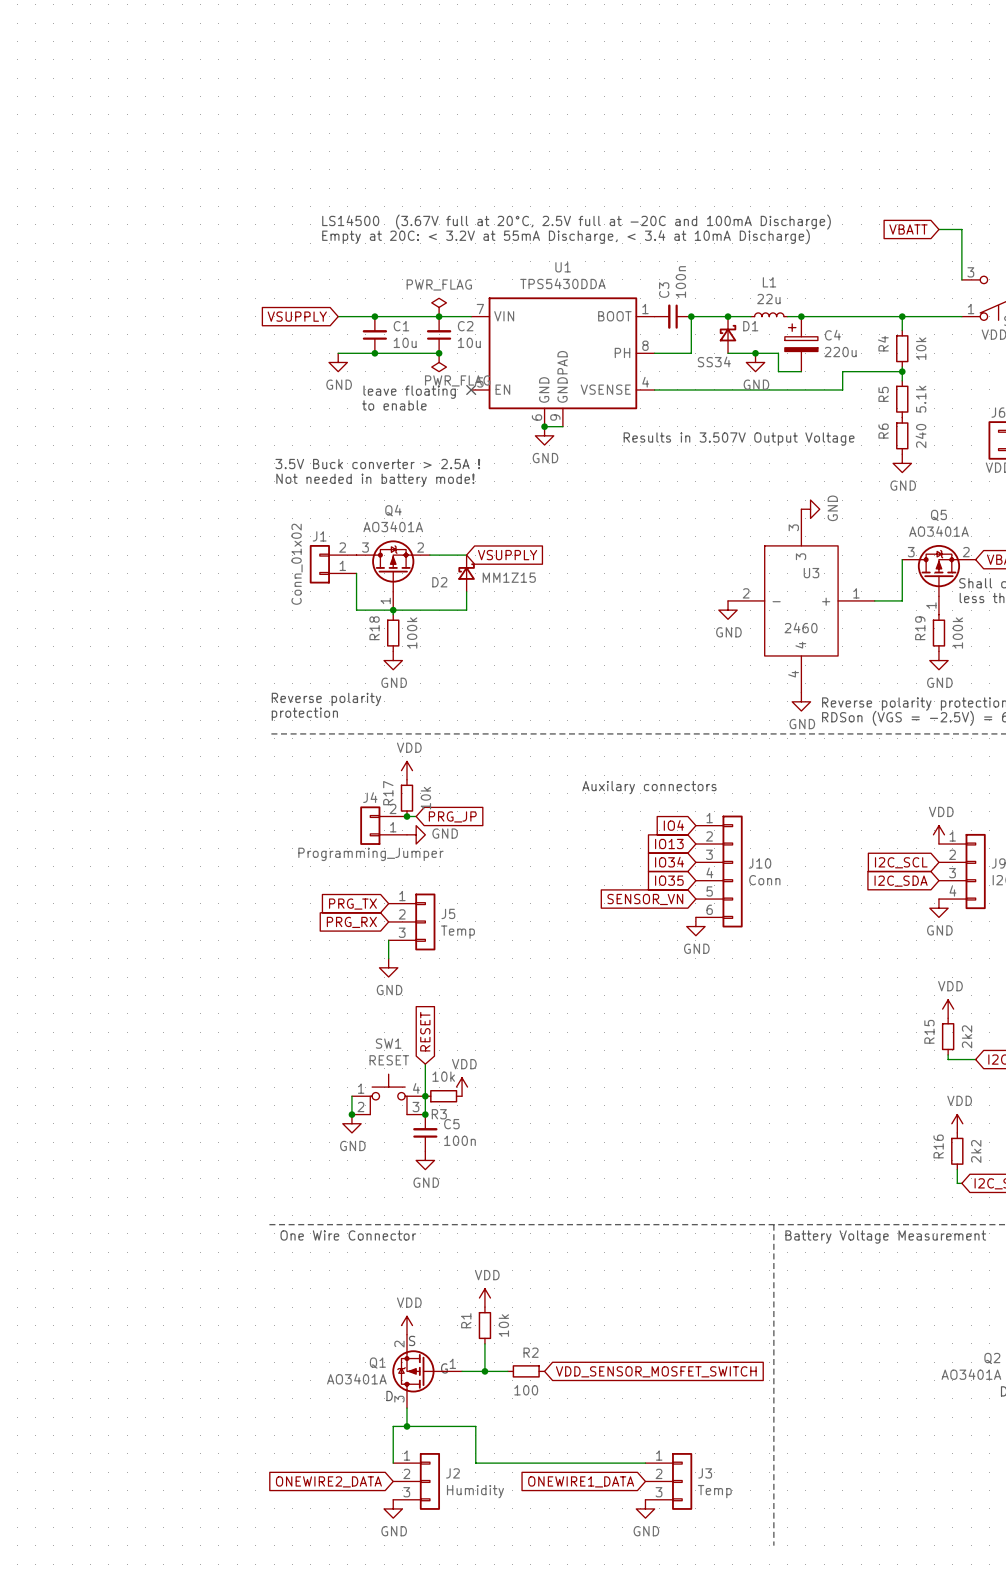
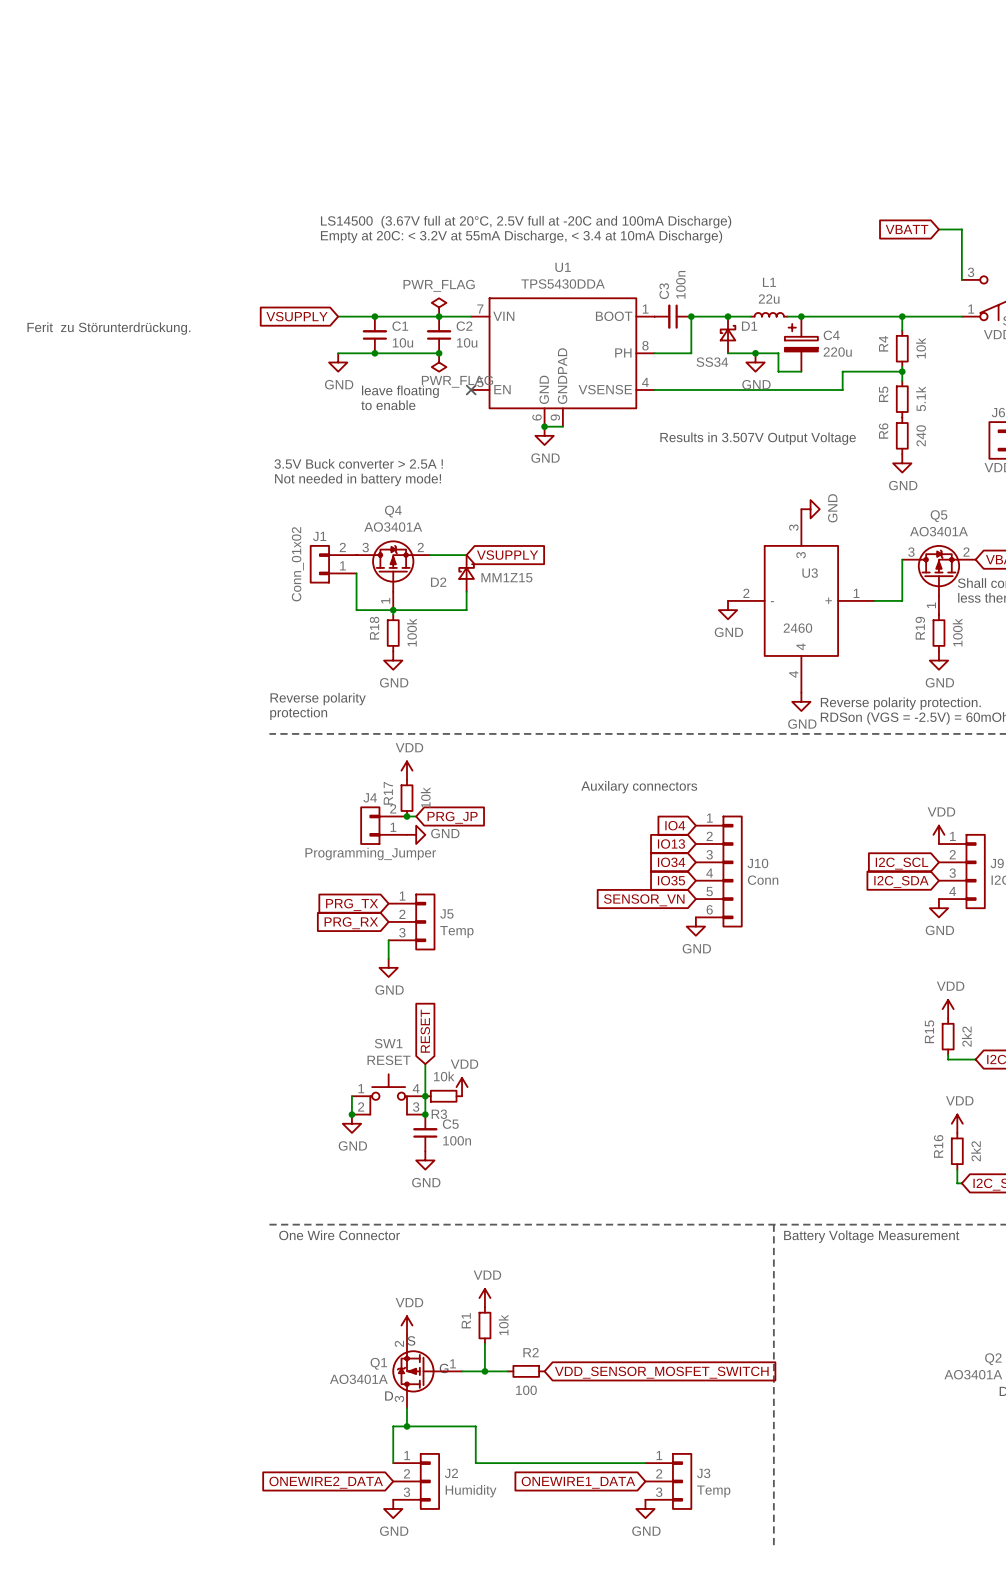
text: none -> Ferit zu Störunterdrückung. (108, 328)

